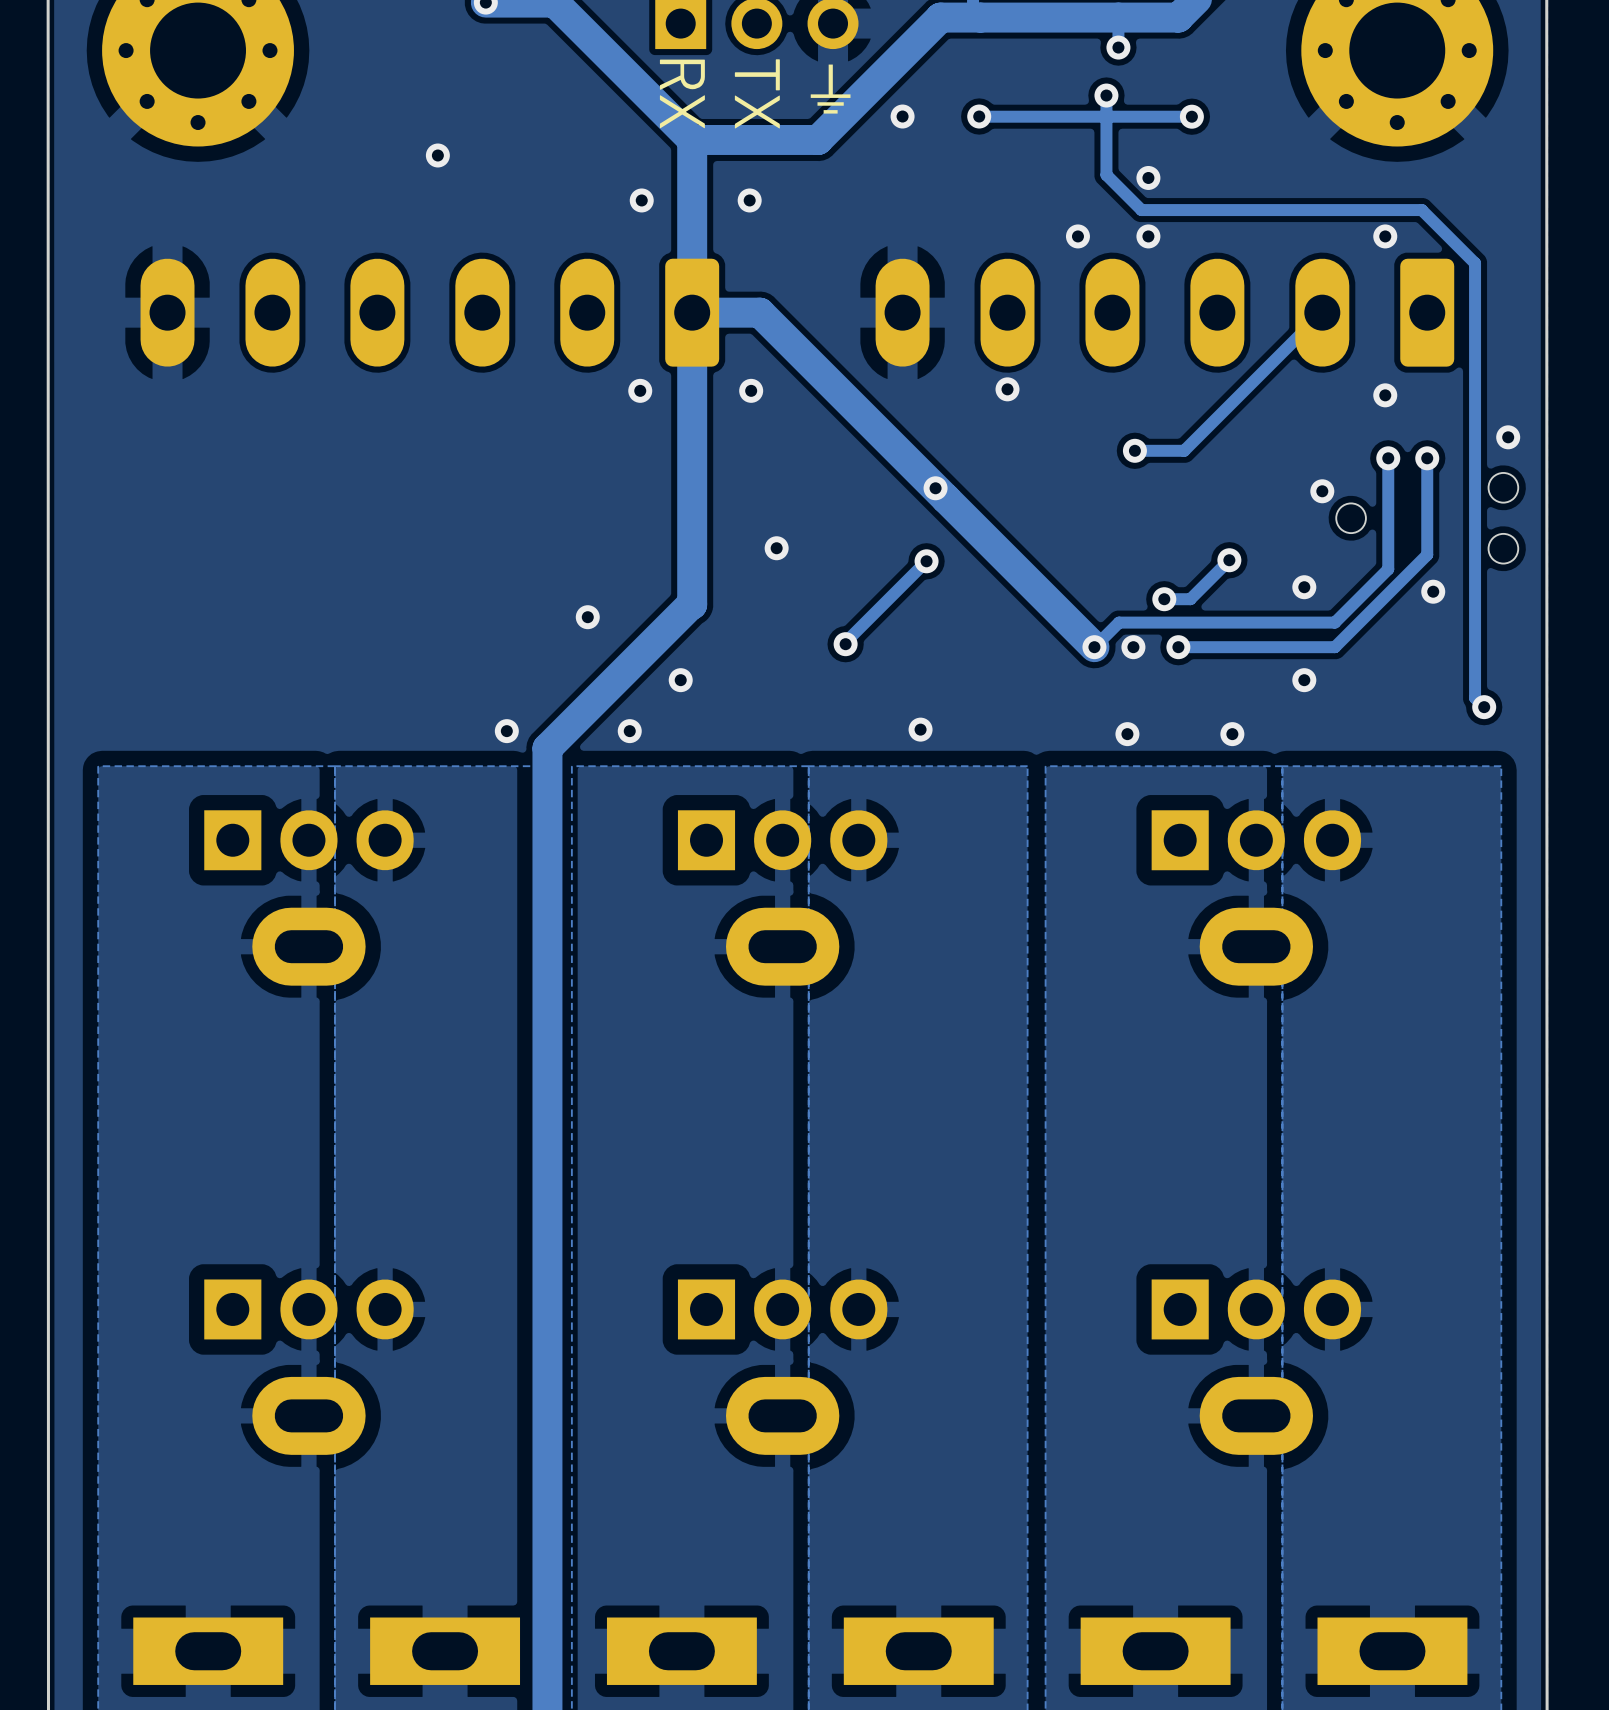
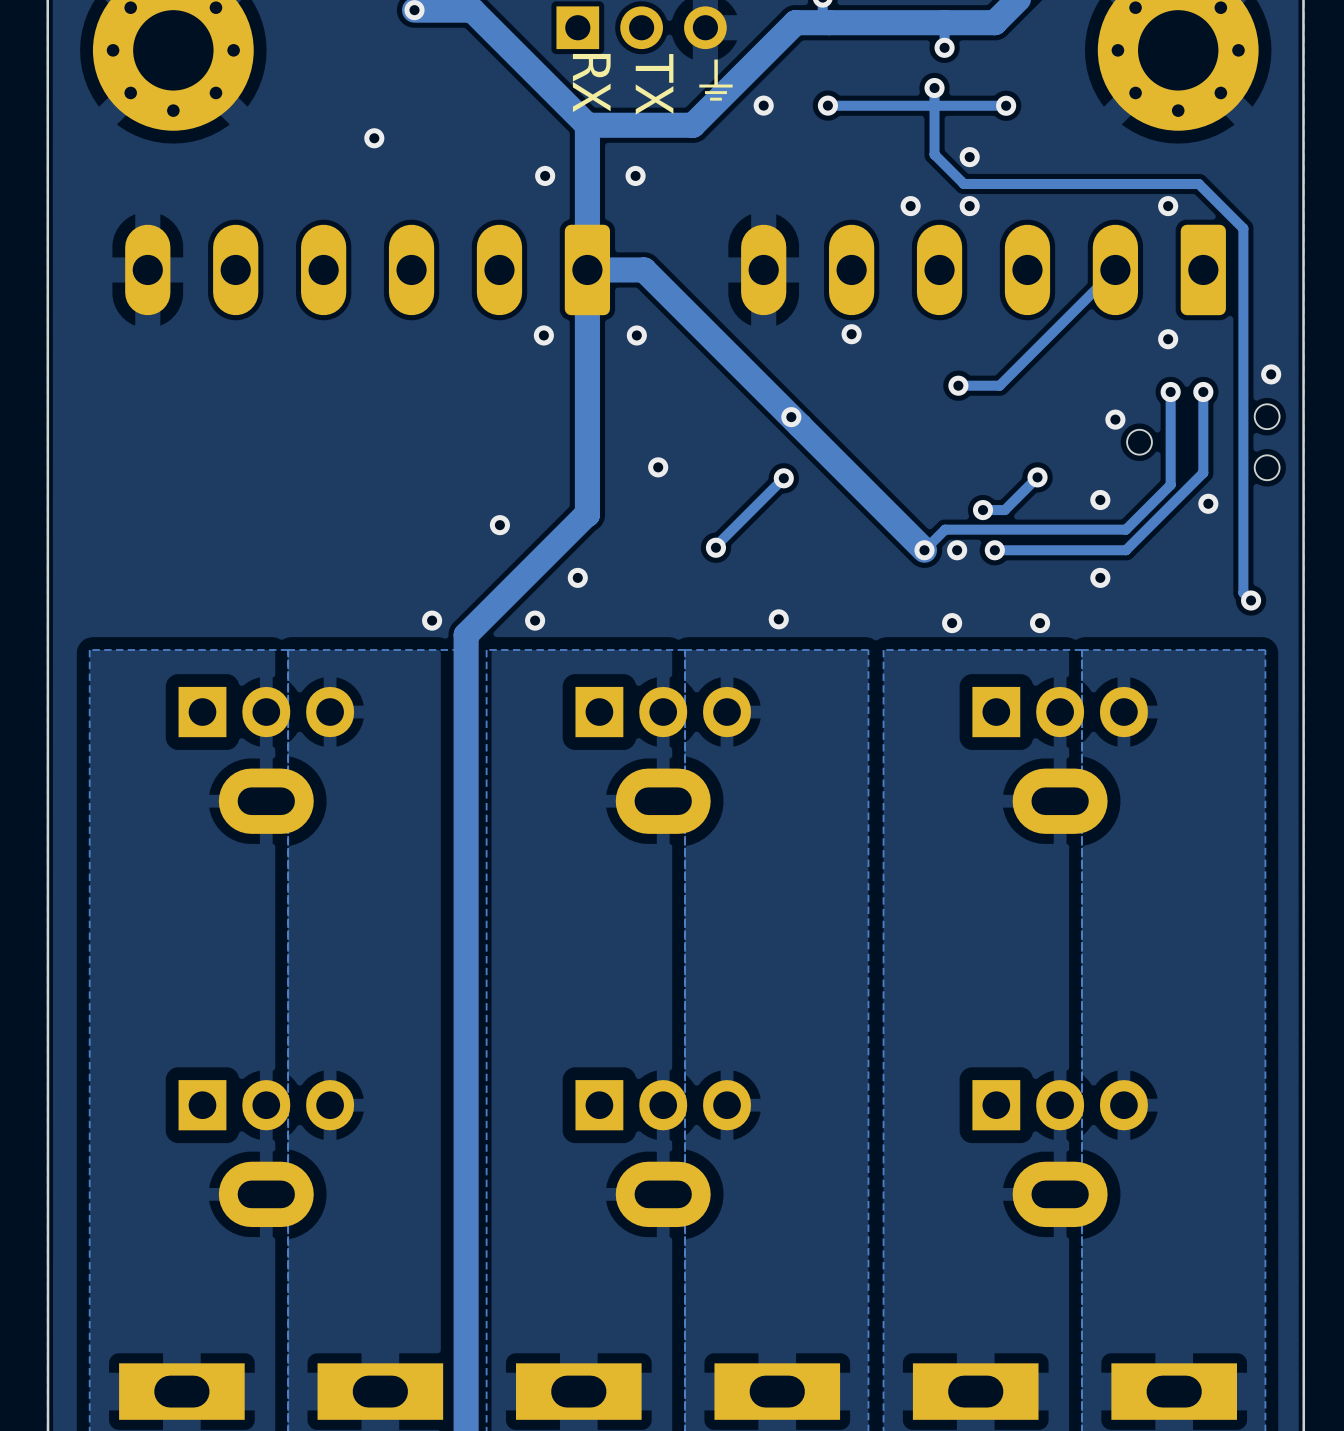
text position: ⏚ (830, 89) -> ⏚ (715, 80)
text position: RX (682, 93) -> RX (591, 83)
text position: TX (757, 93) -> TX (654, 84)

